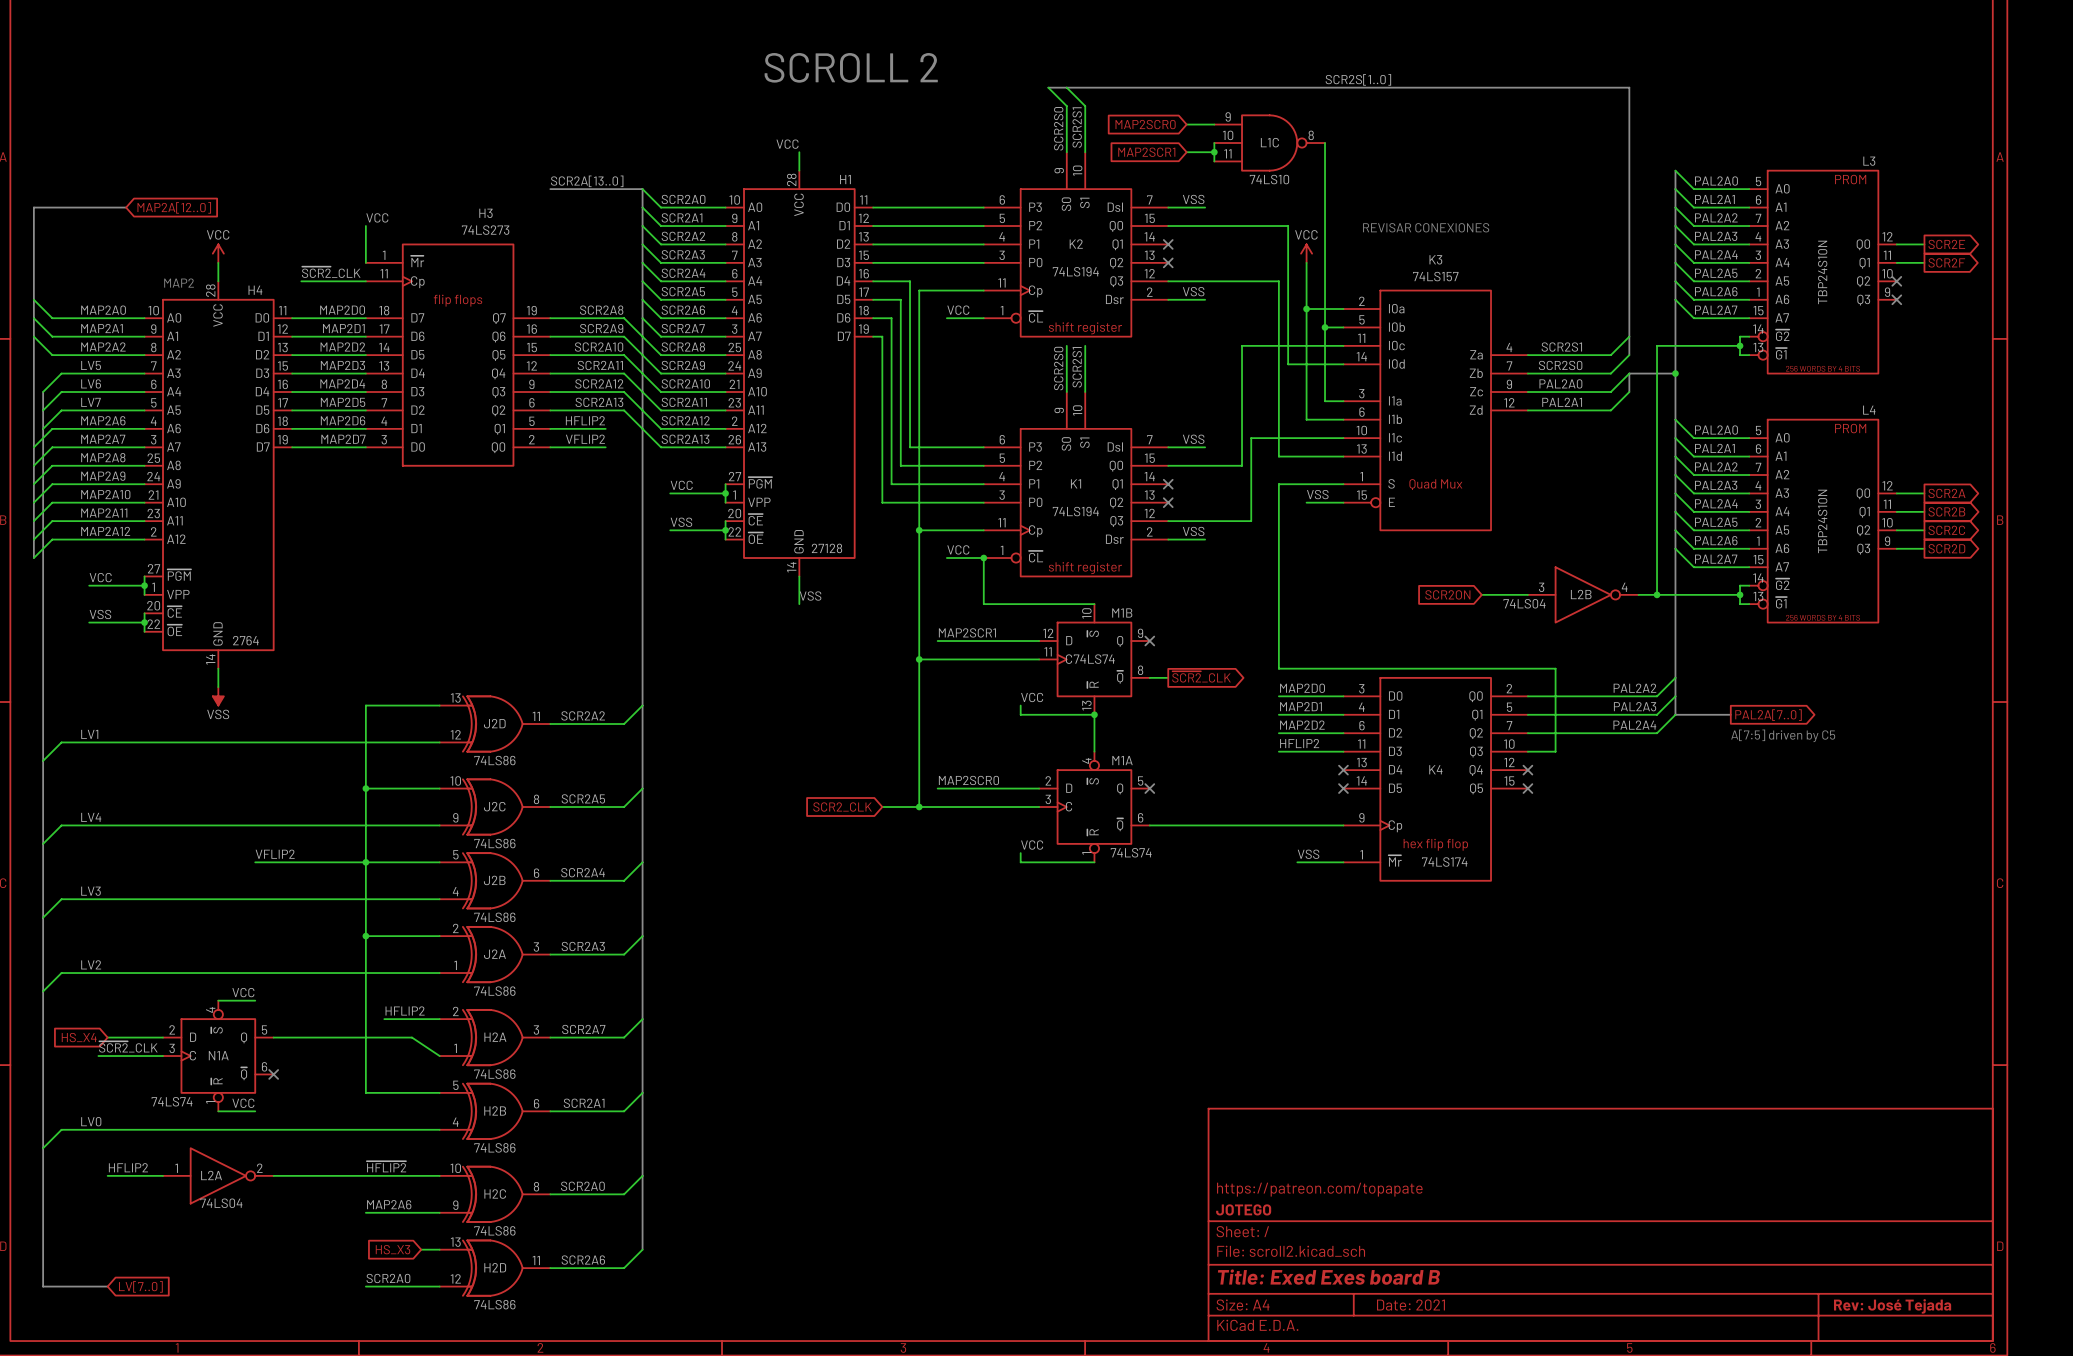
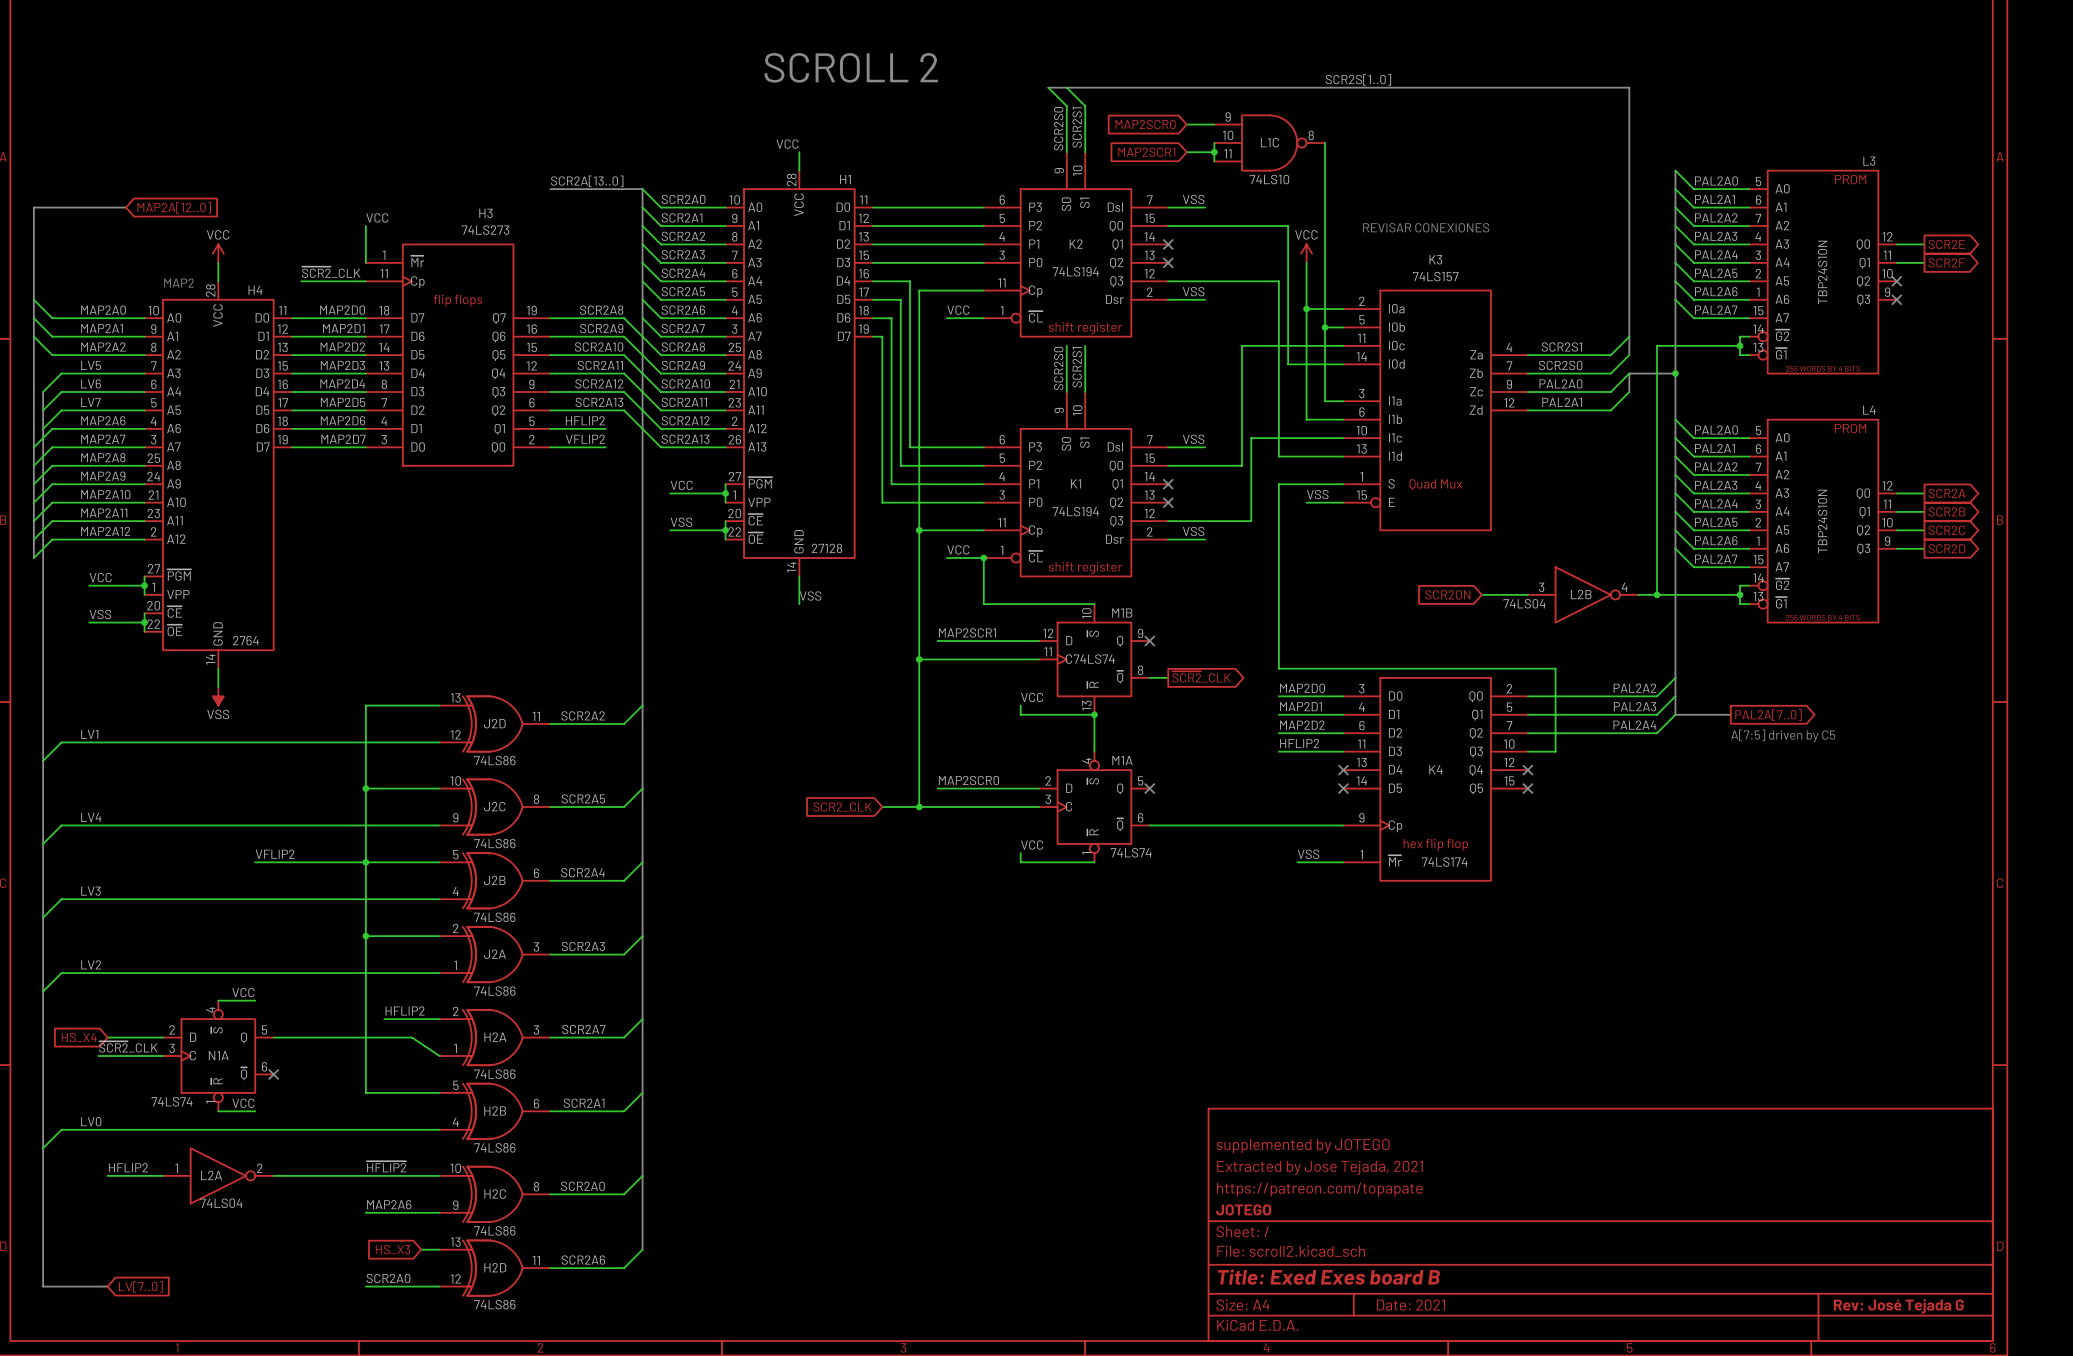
title block: none -> supplemented by JOTEGO (1303, 1146)
title block: none -> Extracted by Jose Tejada, 2021 (1320, 1167)
title block: Rev: José Tejada (1892, 1306) -> Rev: José Tejada G (1898, 1306)

